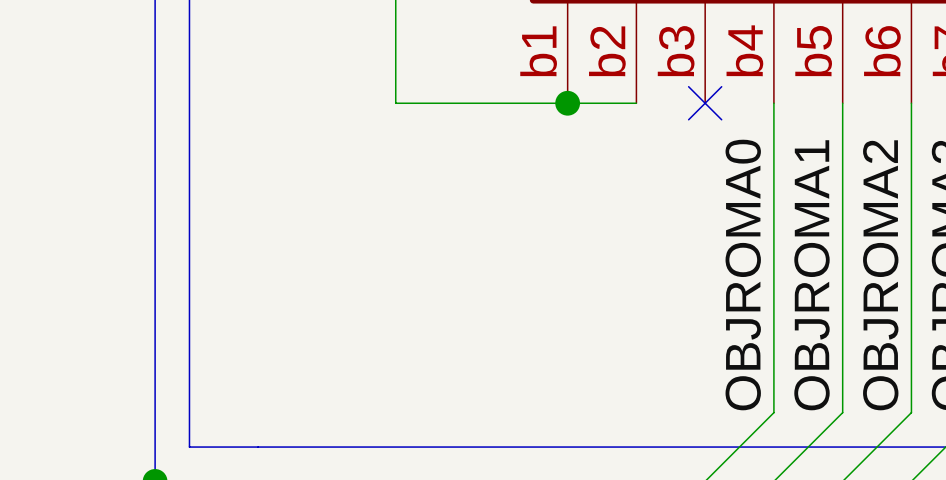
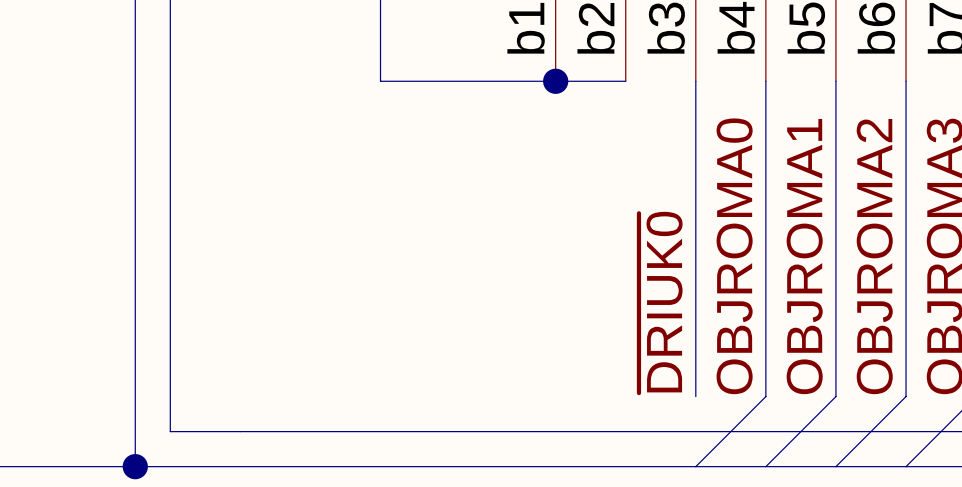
wire: none -> (695, 81) (695, 396)
no-connect mark: (705, 103) -> none
label: none -> ~{DRIUK0} (660, 302)

